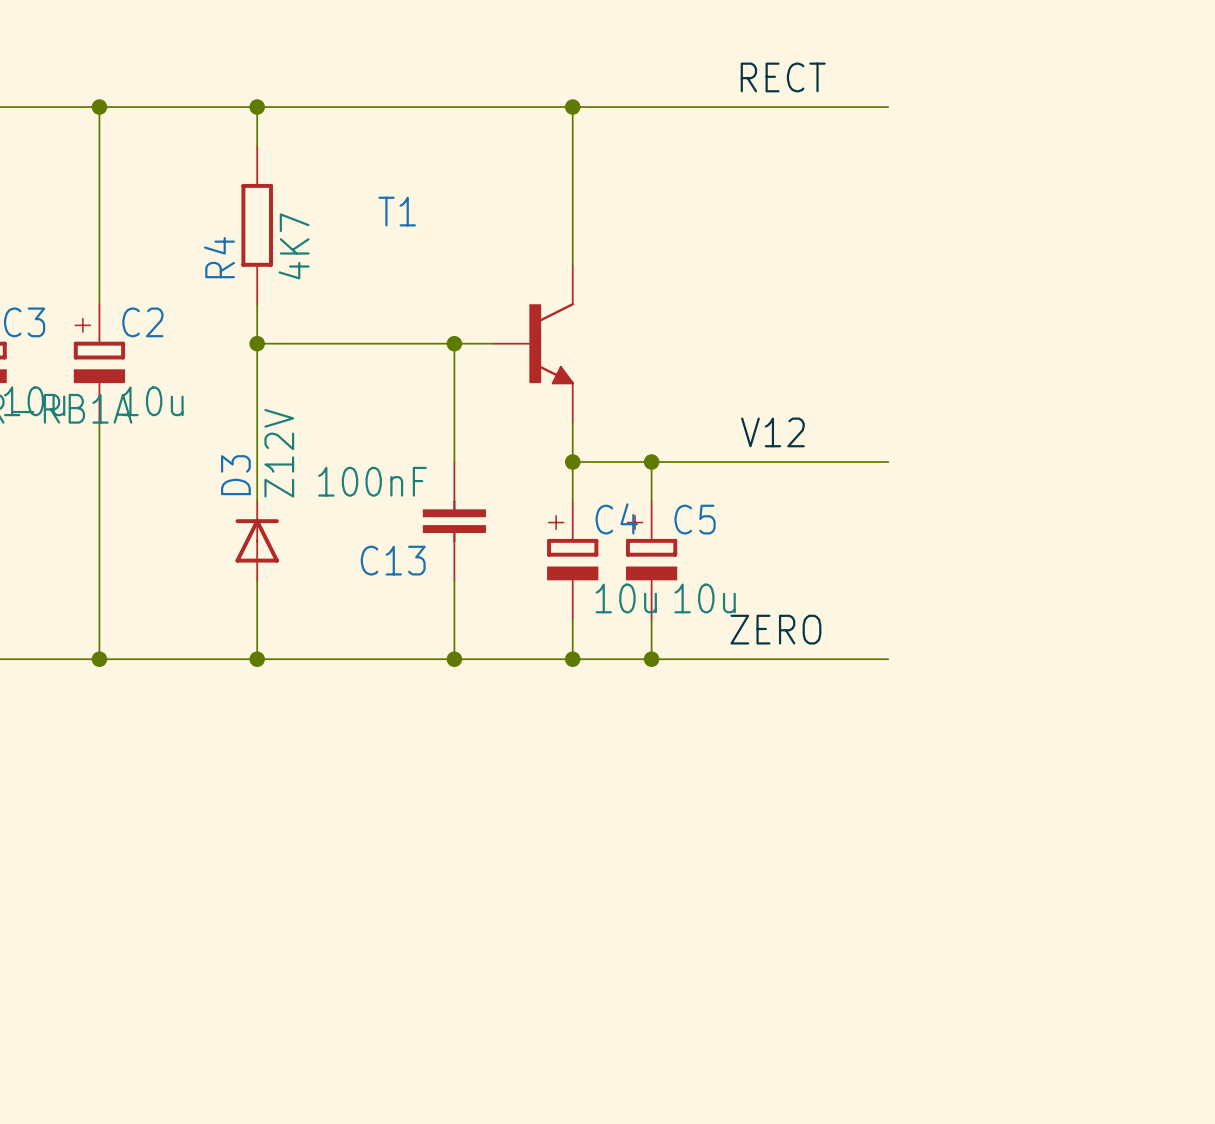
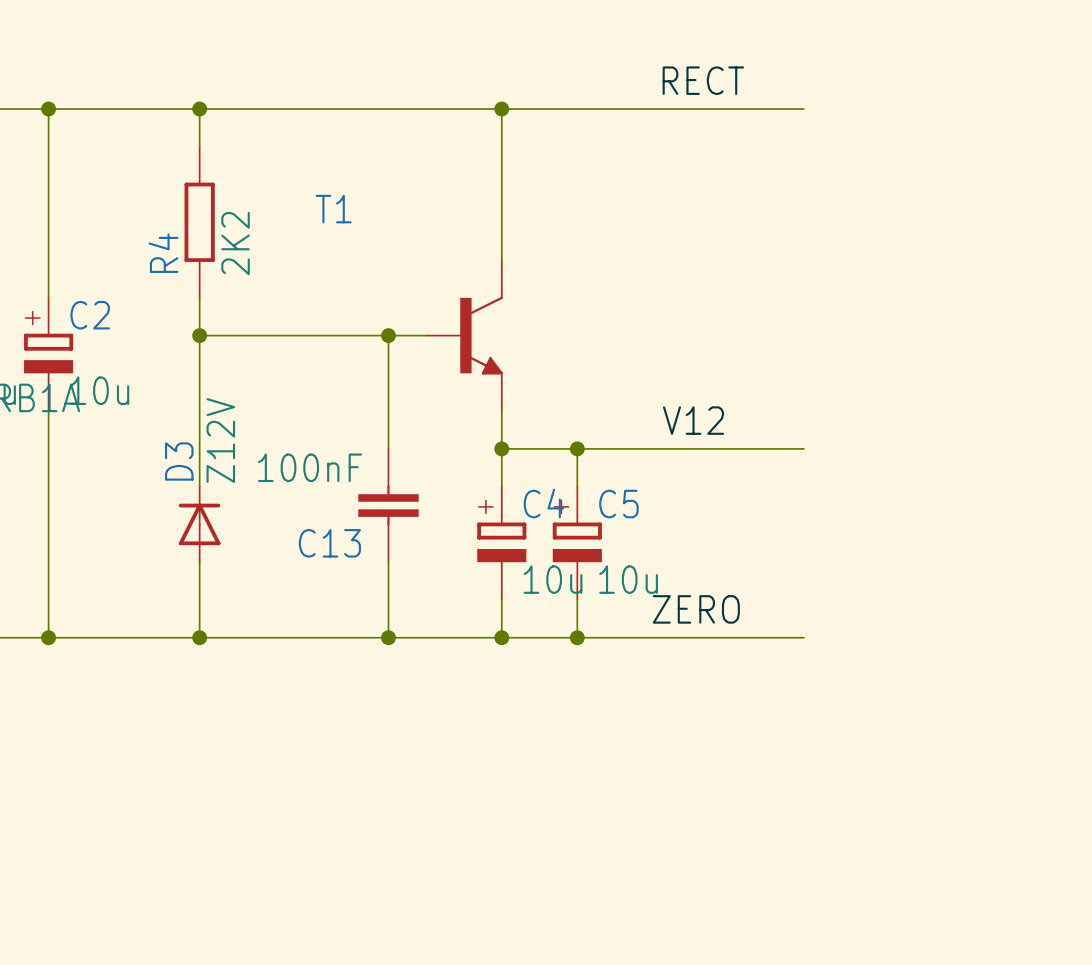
R4 value: 4K7 (294, 246) -> 2K2 (235, 243)

